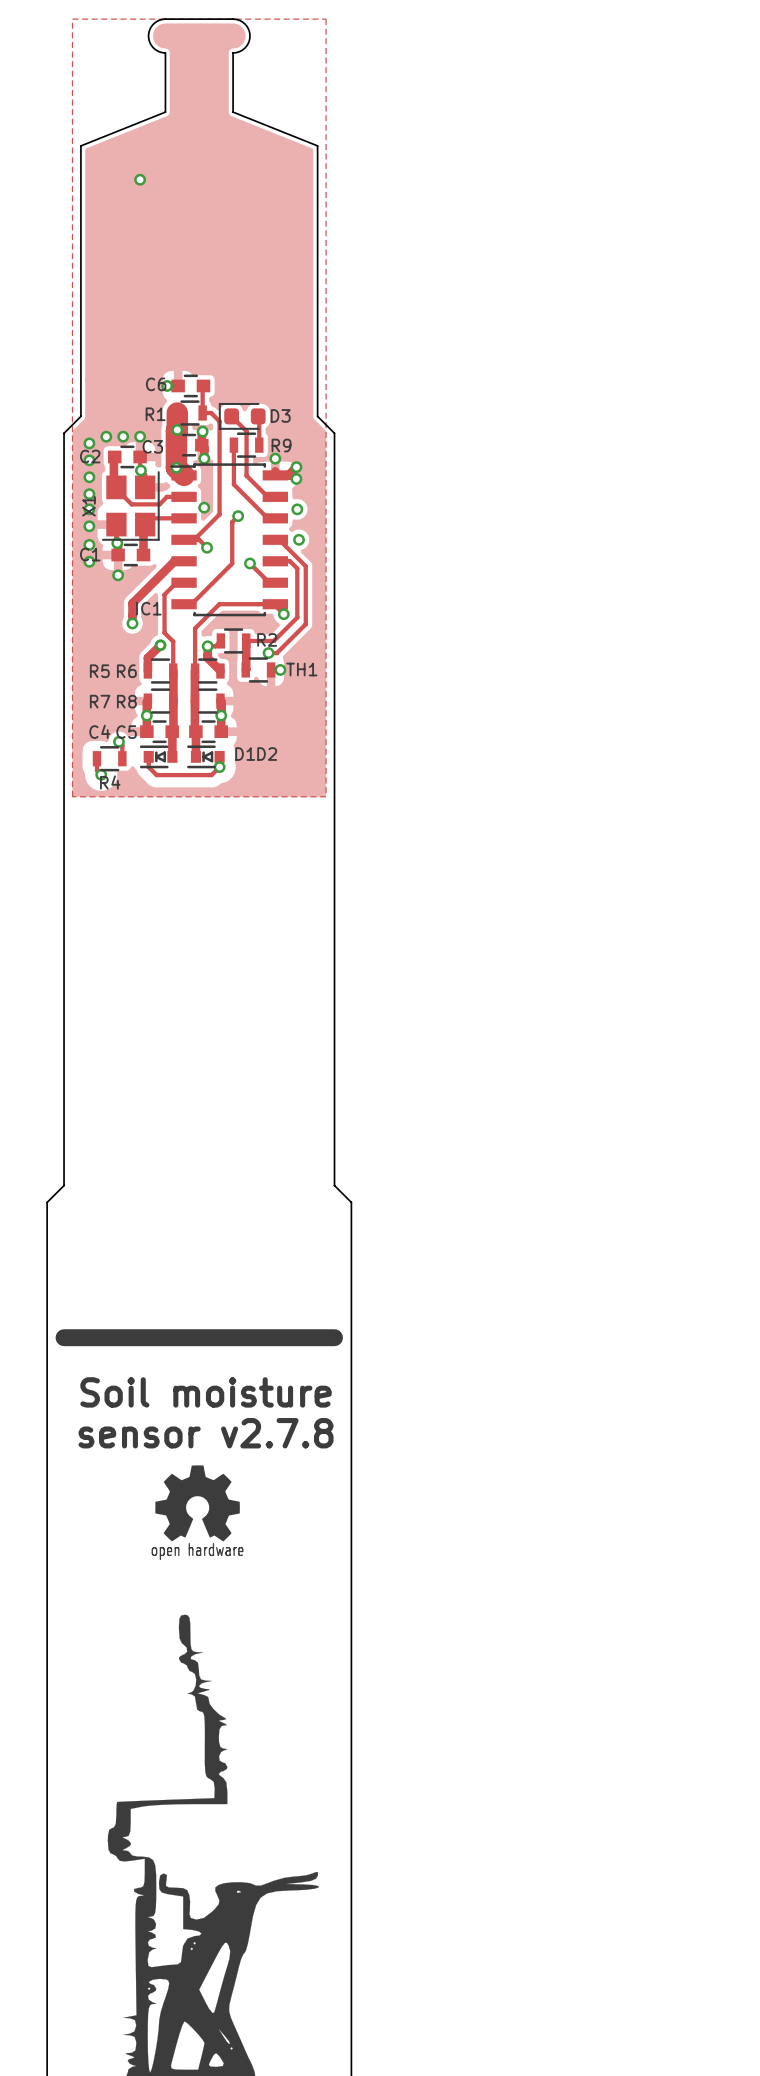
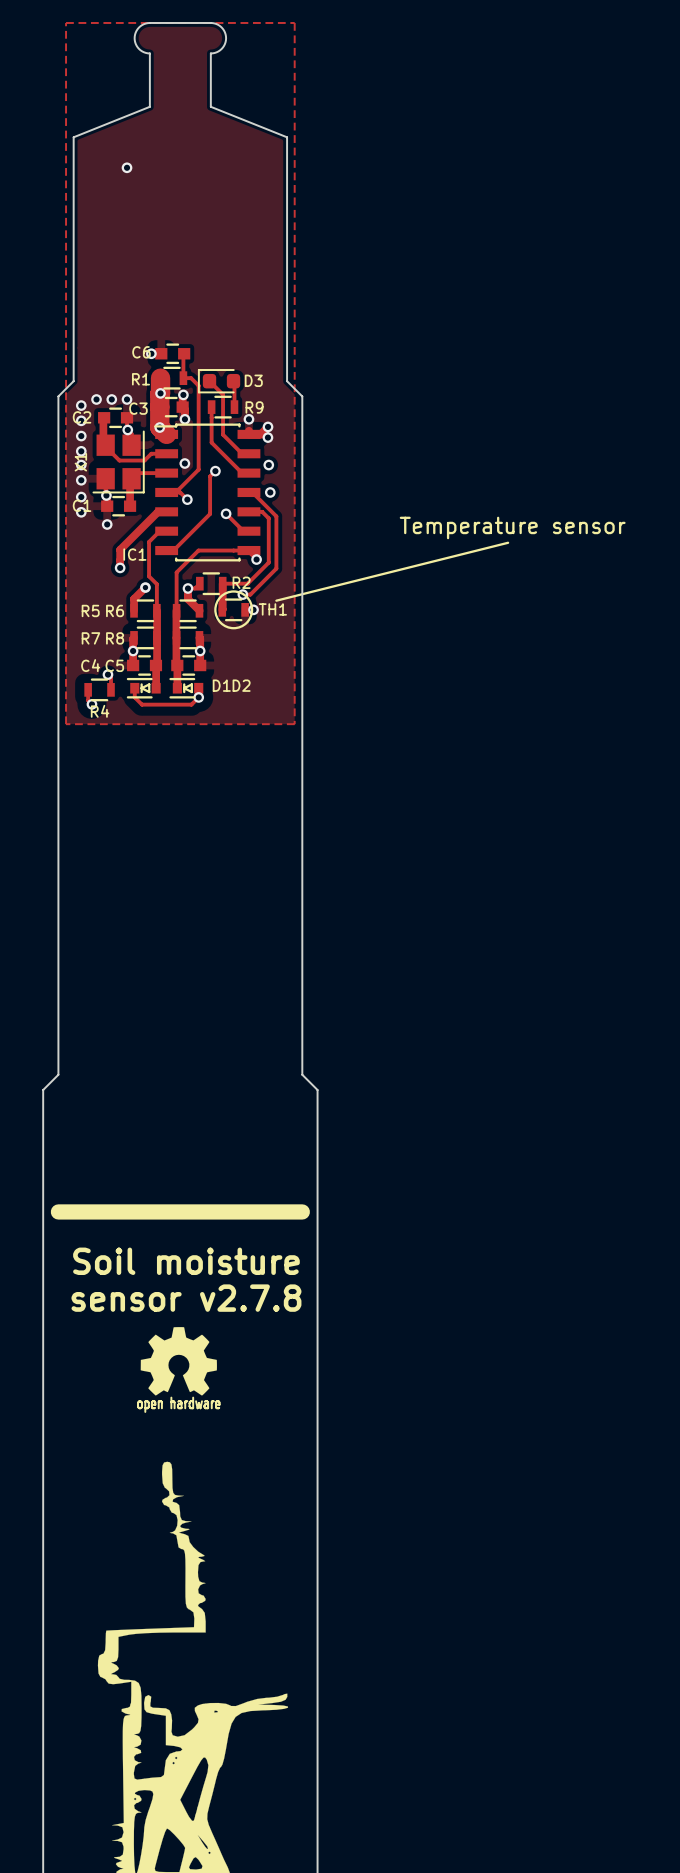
text: none -> Temperature sensor (512, 527)
line: none -> (508, 542) (276, 600)
drawing: none -> [214, 590, 254, 630]

